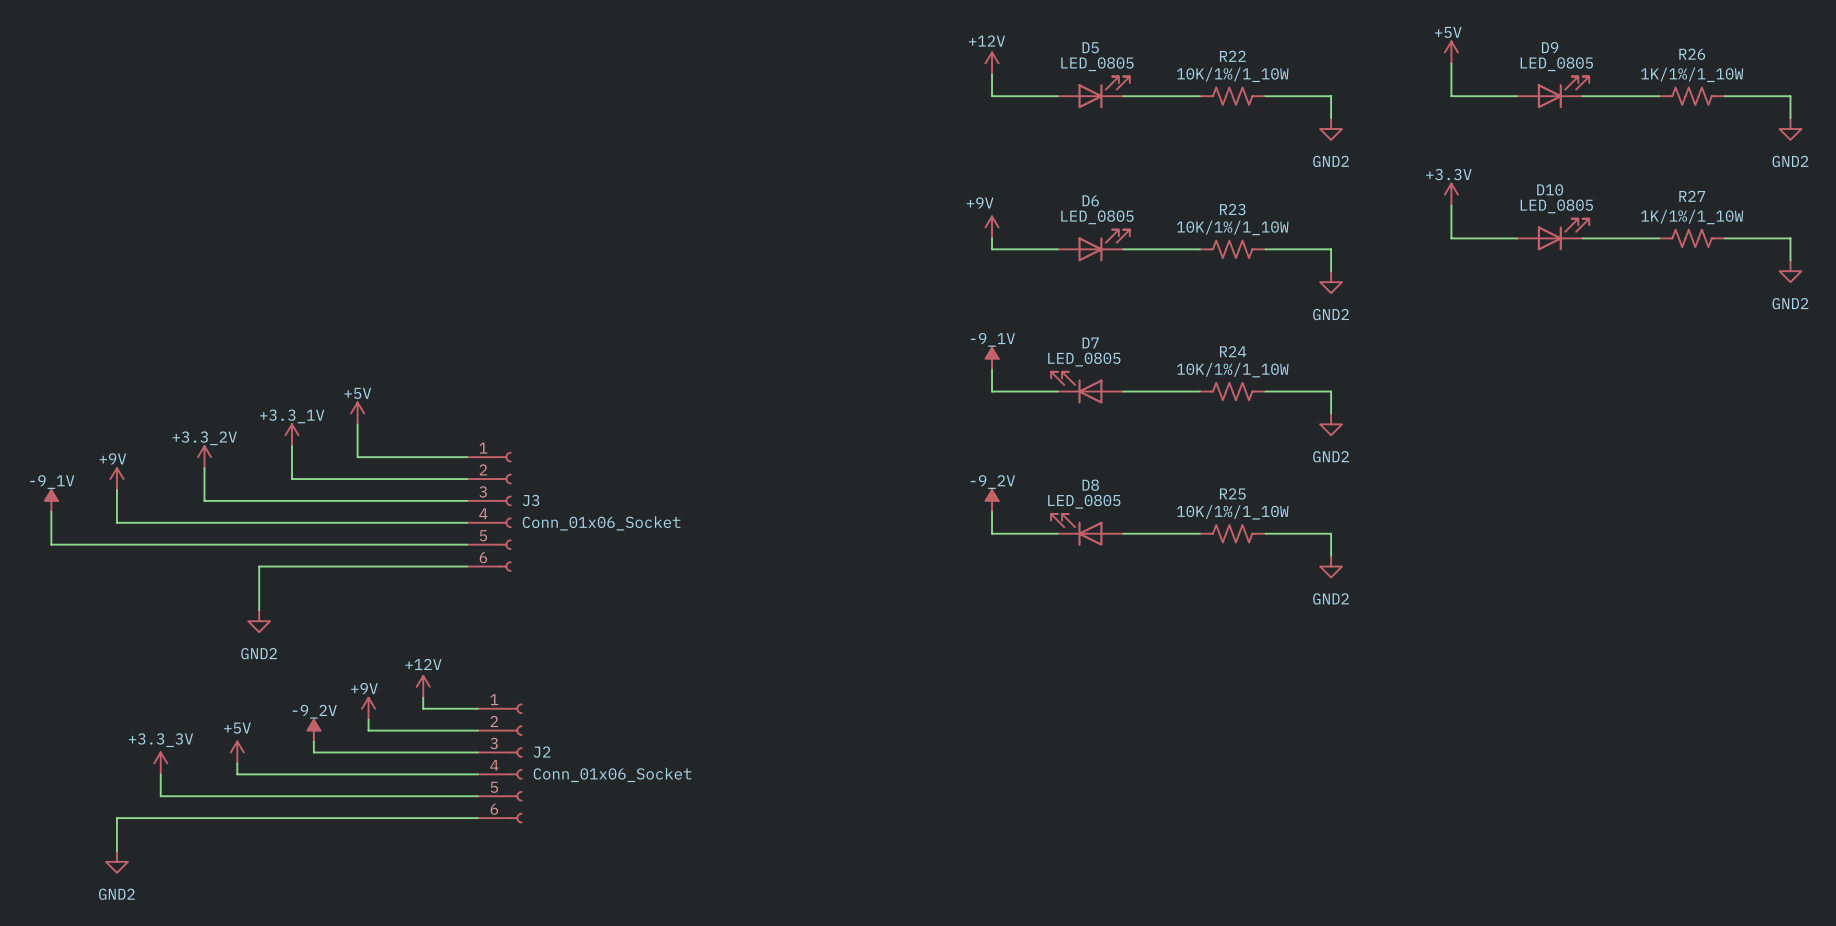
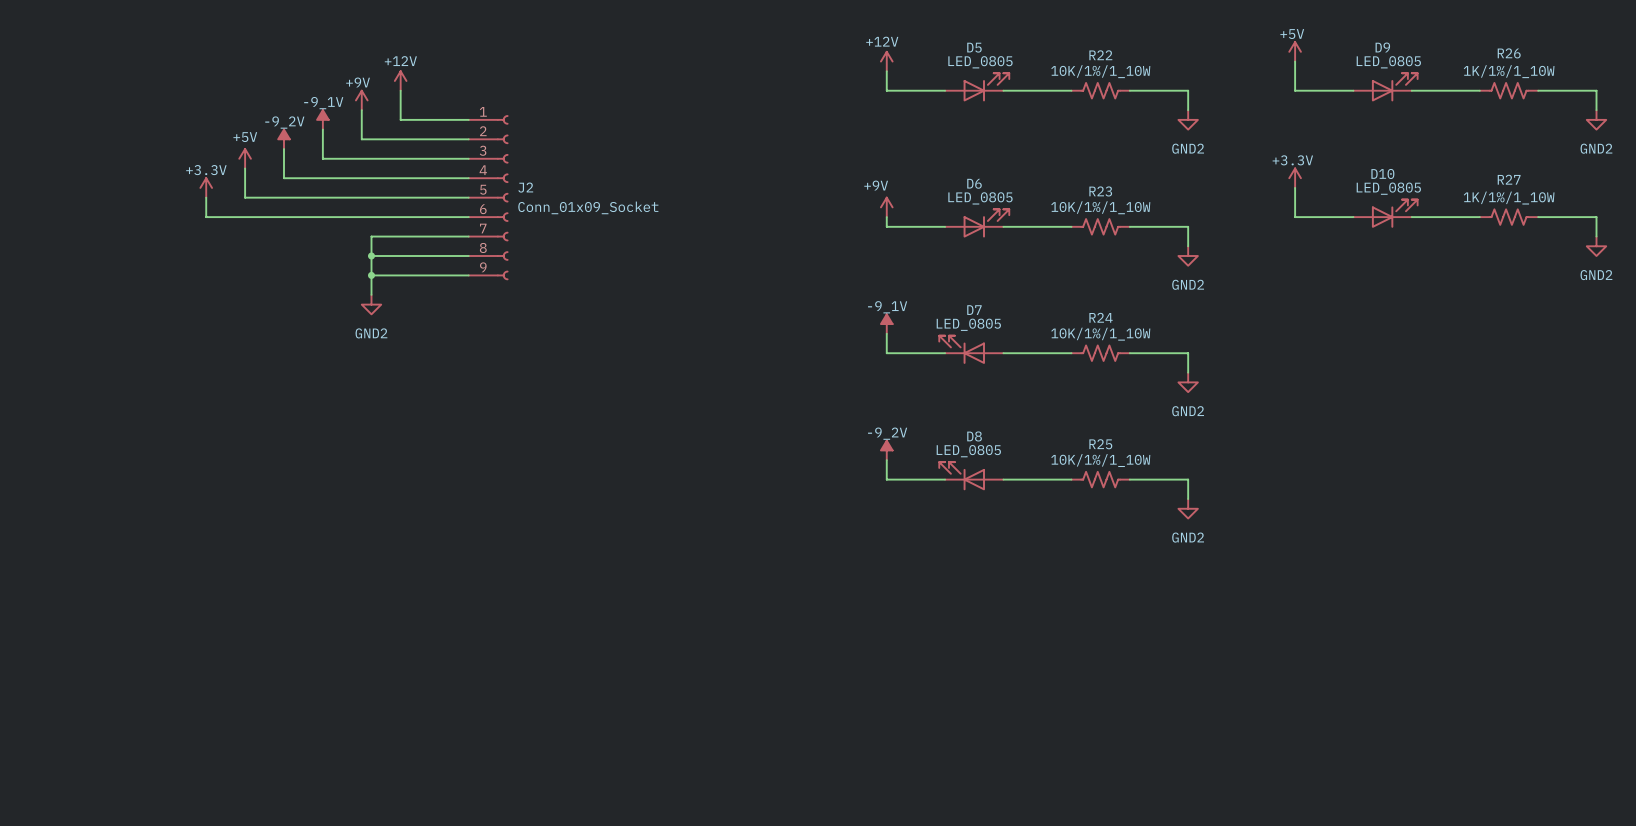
power symbol: none -> +12V (400, 80)
wire: none -> (400, 90) (400, 119) (468, 119)
power symbol: none -> +9V (361, 100)
wire: none -> (361, 110) (361, 139) (468, 139)
power symbol: none -> -9_1V (322, 119)
wire: none -> (322, 129) (322, 158) (468, 158)
power symbol: none -> -9_2V (283, 139)
wire: none -> (283, 149) (283, 178) (468, 178)
power symbol: none -> +5V (245, 158)
wire: none -> (245, 168) (245, 197) (468, 197)
power symbol: none -> +3.3V (206, 187)
wire: none -> (206, 197) (206, 217) (468, 217)
wire: none -> (468, 236) (371, 236) (371, 294)
wire: none -> (371, 255) (468, 255)
junction: none -> (371, 255)
wire: none -> (371, 275) (468, 275)
junction: none -> (371, 275)
power symbol: none -> GND2 (371, 304)
power symbol: +5V (357, 413) -> none
wire: (357, 424) (357, 457) (466, 457) -> none
power symbol: +3.3_1V (291, 435) -> none
wire: (291, 446) (291, 479) (466, 479) -> none
power symbol: +3.3_2V (204, 457) -> none
wire: (204, 468) (204, 500) (466, 500) -> none
power symbol: +9V (116, 479) -> none
wire: (116, 489) (116, 522) (466, 522) -> none
power symbol: -9_1V (51, 500) -> none
wire: (51, 511) (51, 544) (466, 544) -> none
J3: Conn_01x06_Socket (489, 511) -> none
wire: (466, 566) (259, 566) (259, 610) -> none
power symbol: GND2 (259, 621) -> none
power symbol: +12V (423, 686) -> none
wire: (423, 697) (423, 708) (477, 708) -> none
J2 symbol: [477, 703, 523, 824] -> [468, 115, 509, 280]
power symbol: +9V (368, 708) -> none
wire: (368, 719) (368, 730) (477, 730) -> none
power symbol: -9_2V (313, 730) -> none
wire: (313, 741) (313, 752) (477, 752) -> none
power symbol: +5V (237, 752) -> none
power symbol: +3.3_3V (160, 763) -> none
wire: (237, 763) (237, 774) (477, 774) -> none
wire: (160, 774) (160, 796) (477, 796) -> none
J2 value: Conn_01x06_Socket (612, 774) -> Conn_01x09_Socket (588, 207)
wire: (477, 818) (116, 818) (116, 850) -> none
power symbol: GND2 (116, 861) -> none

